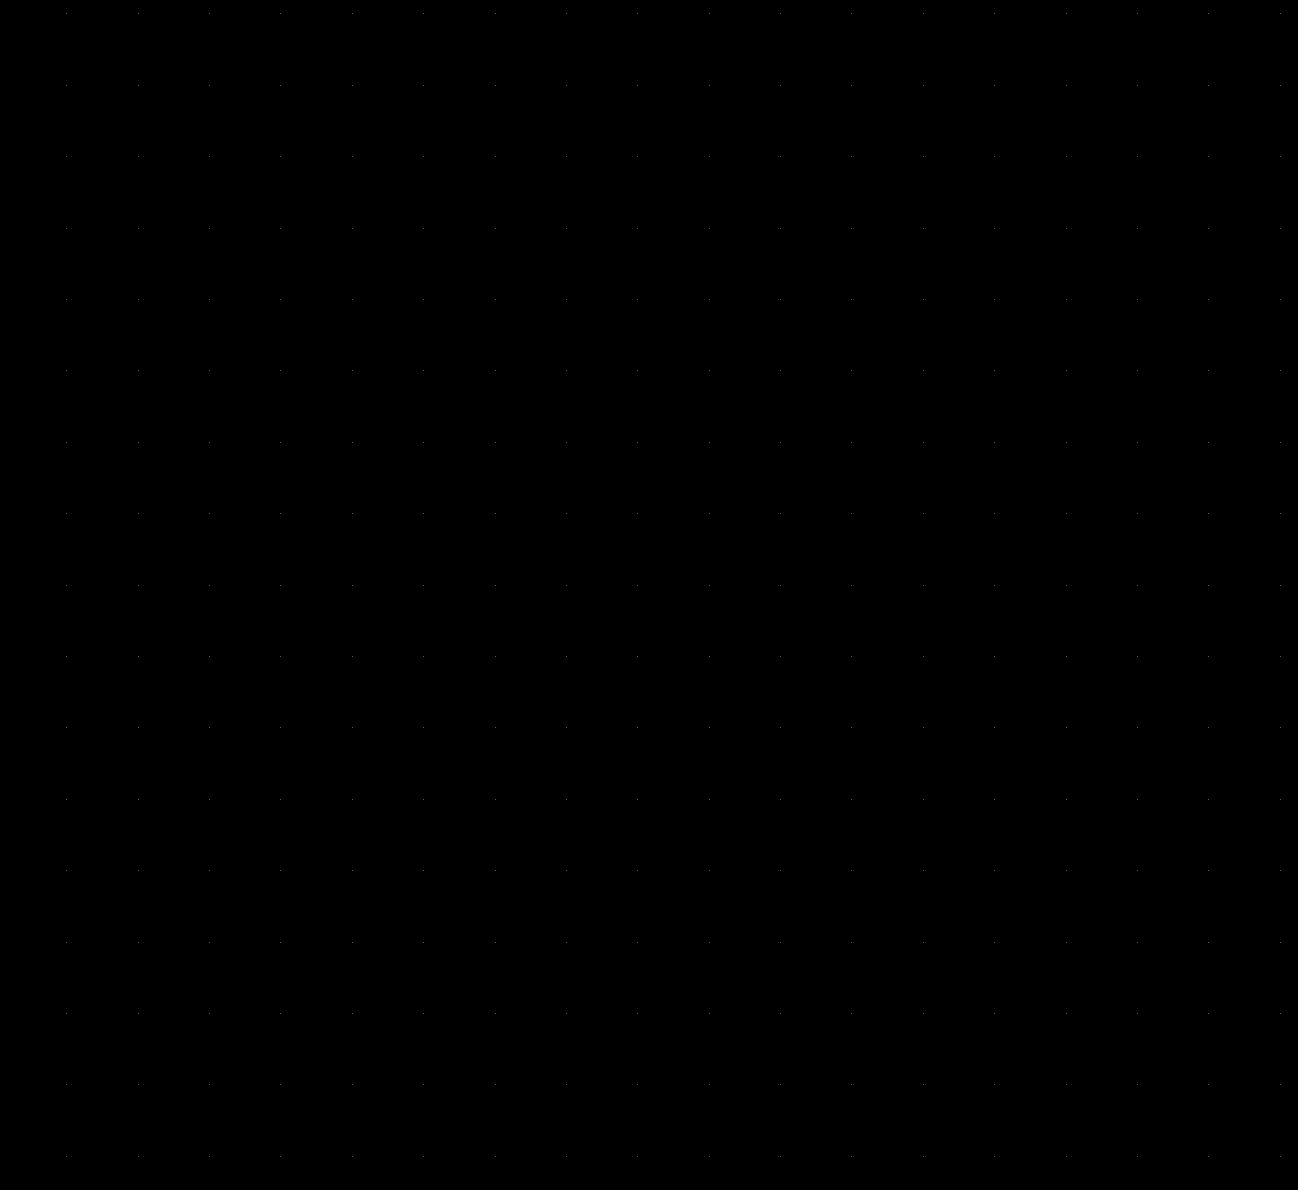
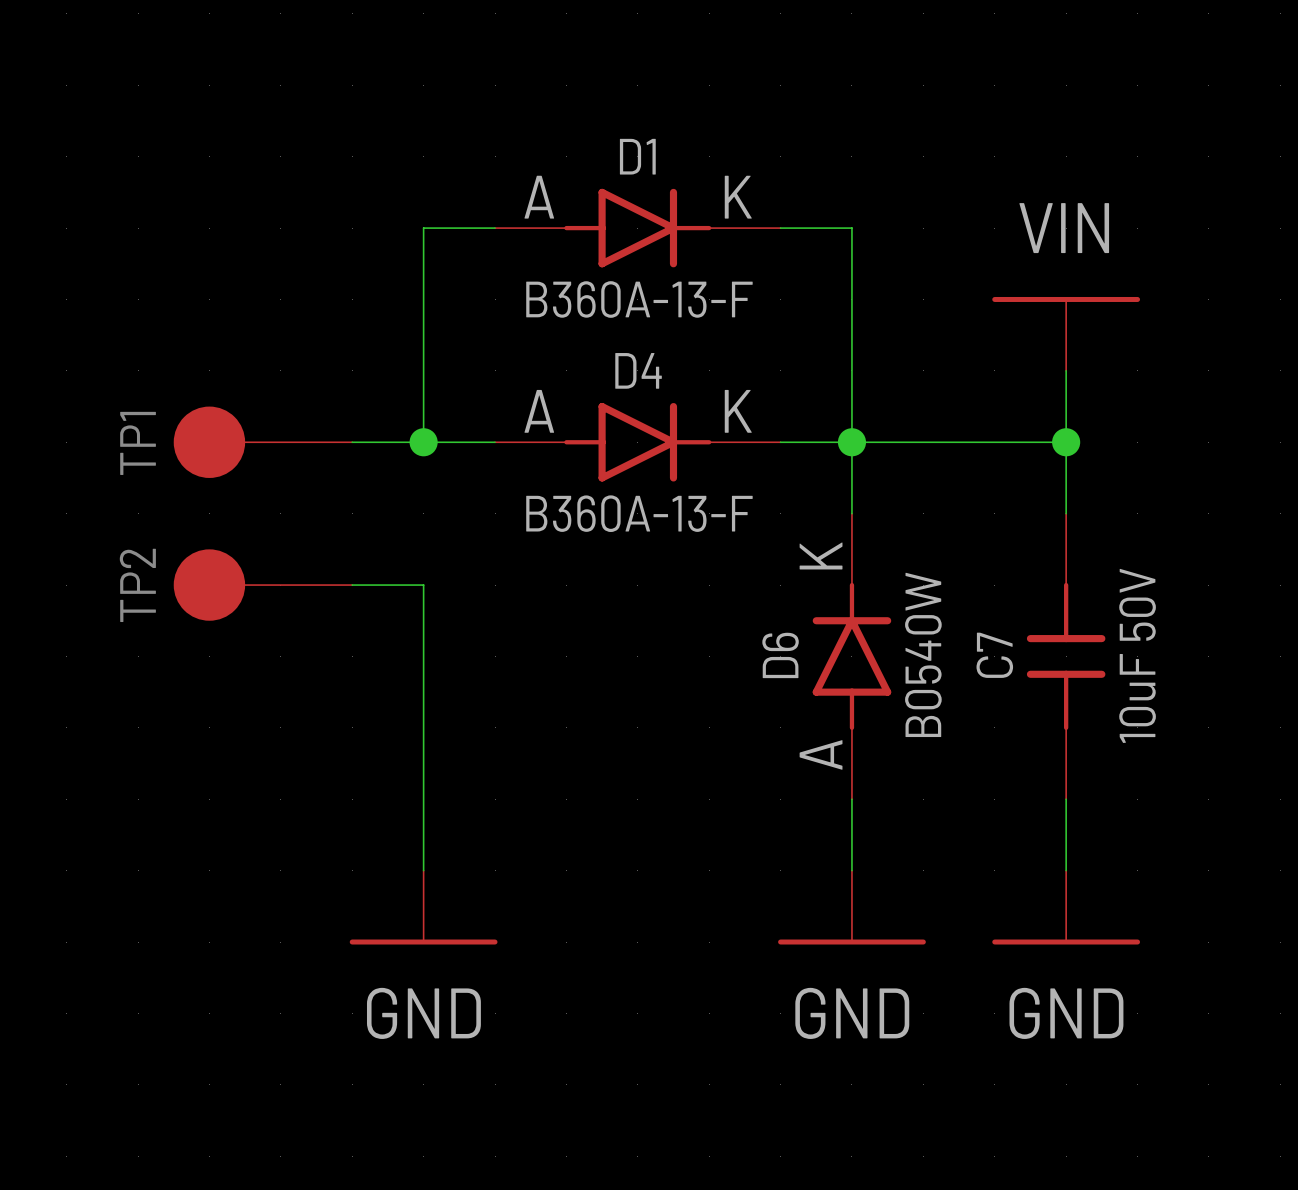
wire: none -> (495, 228) (423, 228) (423, 442)
D1: none -> B360A-13-F (637, 228)
wire: none -> (780, 228) (851, 228) (851, 513)
power symbol: none -> VIN (1066, 333)
wire: none -> (1066, 370) (1066, 513)
TP1: none -> (262, 442)
wire: none -> (352, 442) (495, 442)
junction: none -> (423, 442)
D4: none -> B360A-13-F (637, 442)
wire: none -> (780, 442) (1066, 442)
junction: none -> (851, 442)
junction: none -> (1066, 442)
TP2: none -> (262, 585)
wire: none -> (352, 585) (423, 585) (423, 870)
D6: none -> B0540W (851, 656)
C7: none -> 10uF 50V (1066, 656)
wire: none -> (851, 799) (851, 870)
wire: none -> (1066, 799) (1066, 870)
power symbol: none -> GND (423, 907)
power symbol: none -> GND (851, 907)
power symbol: none -> GND (1066, 907)

